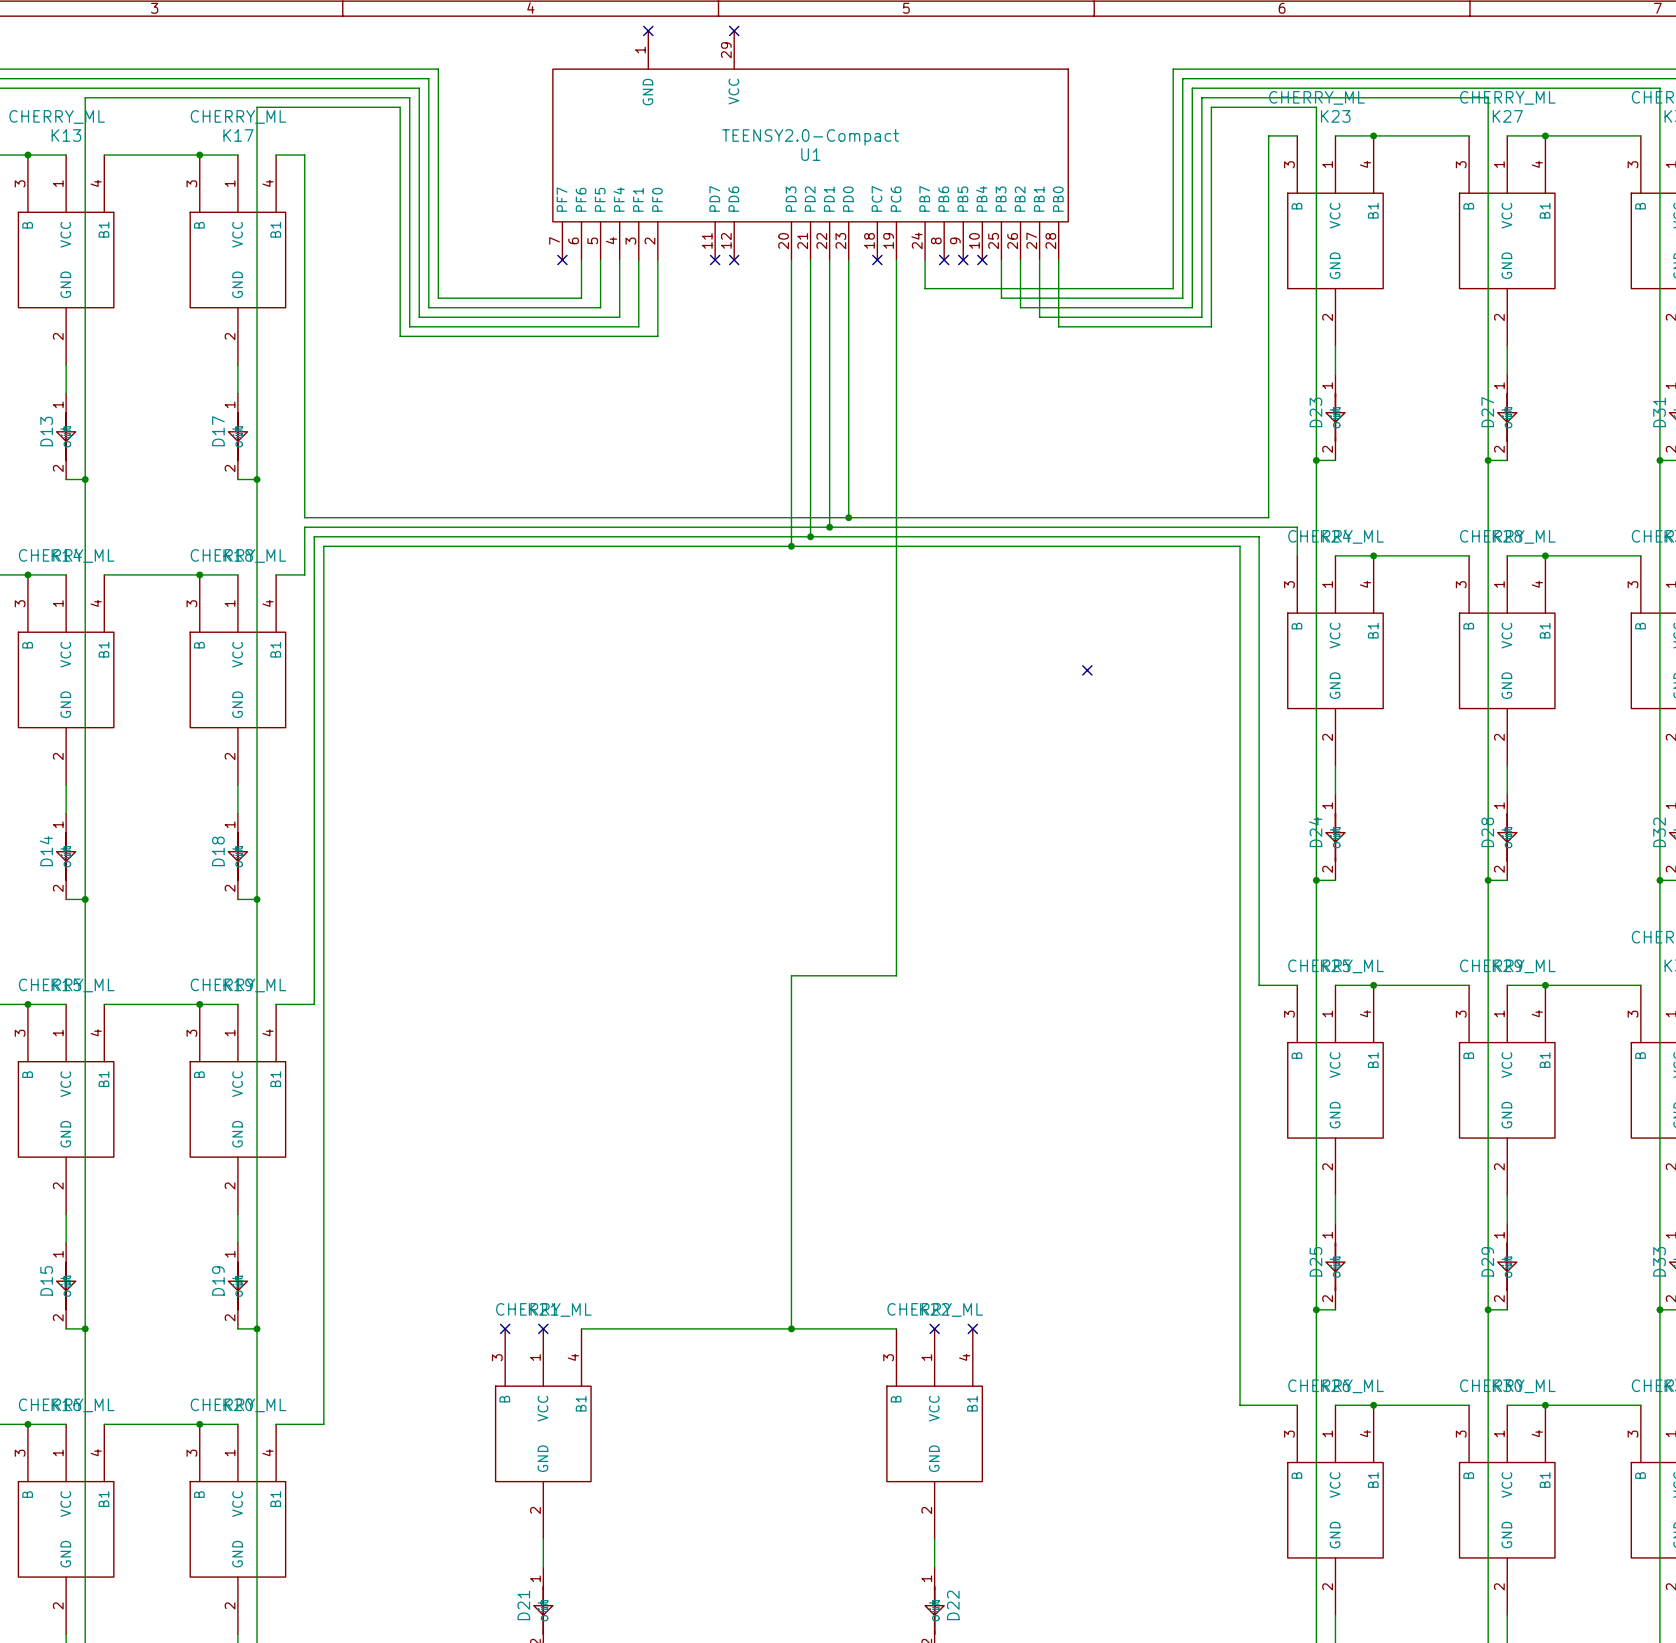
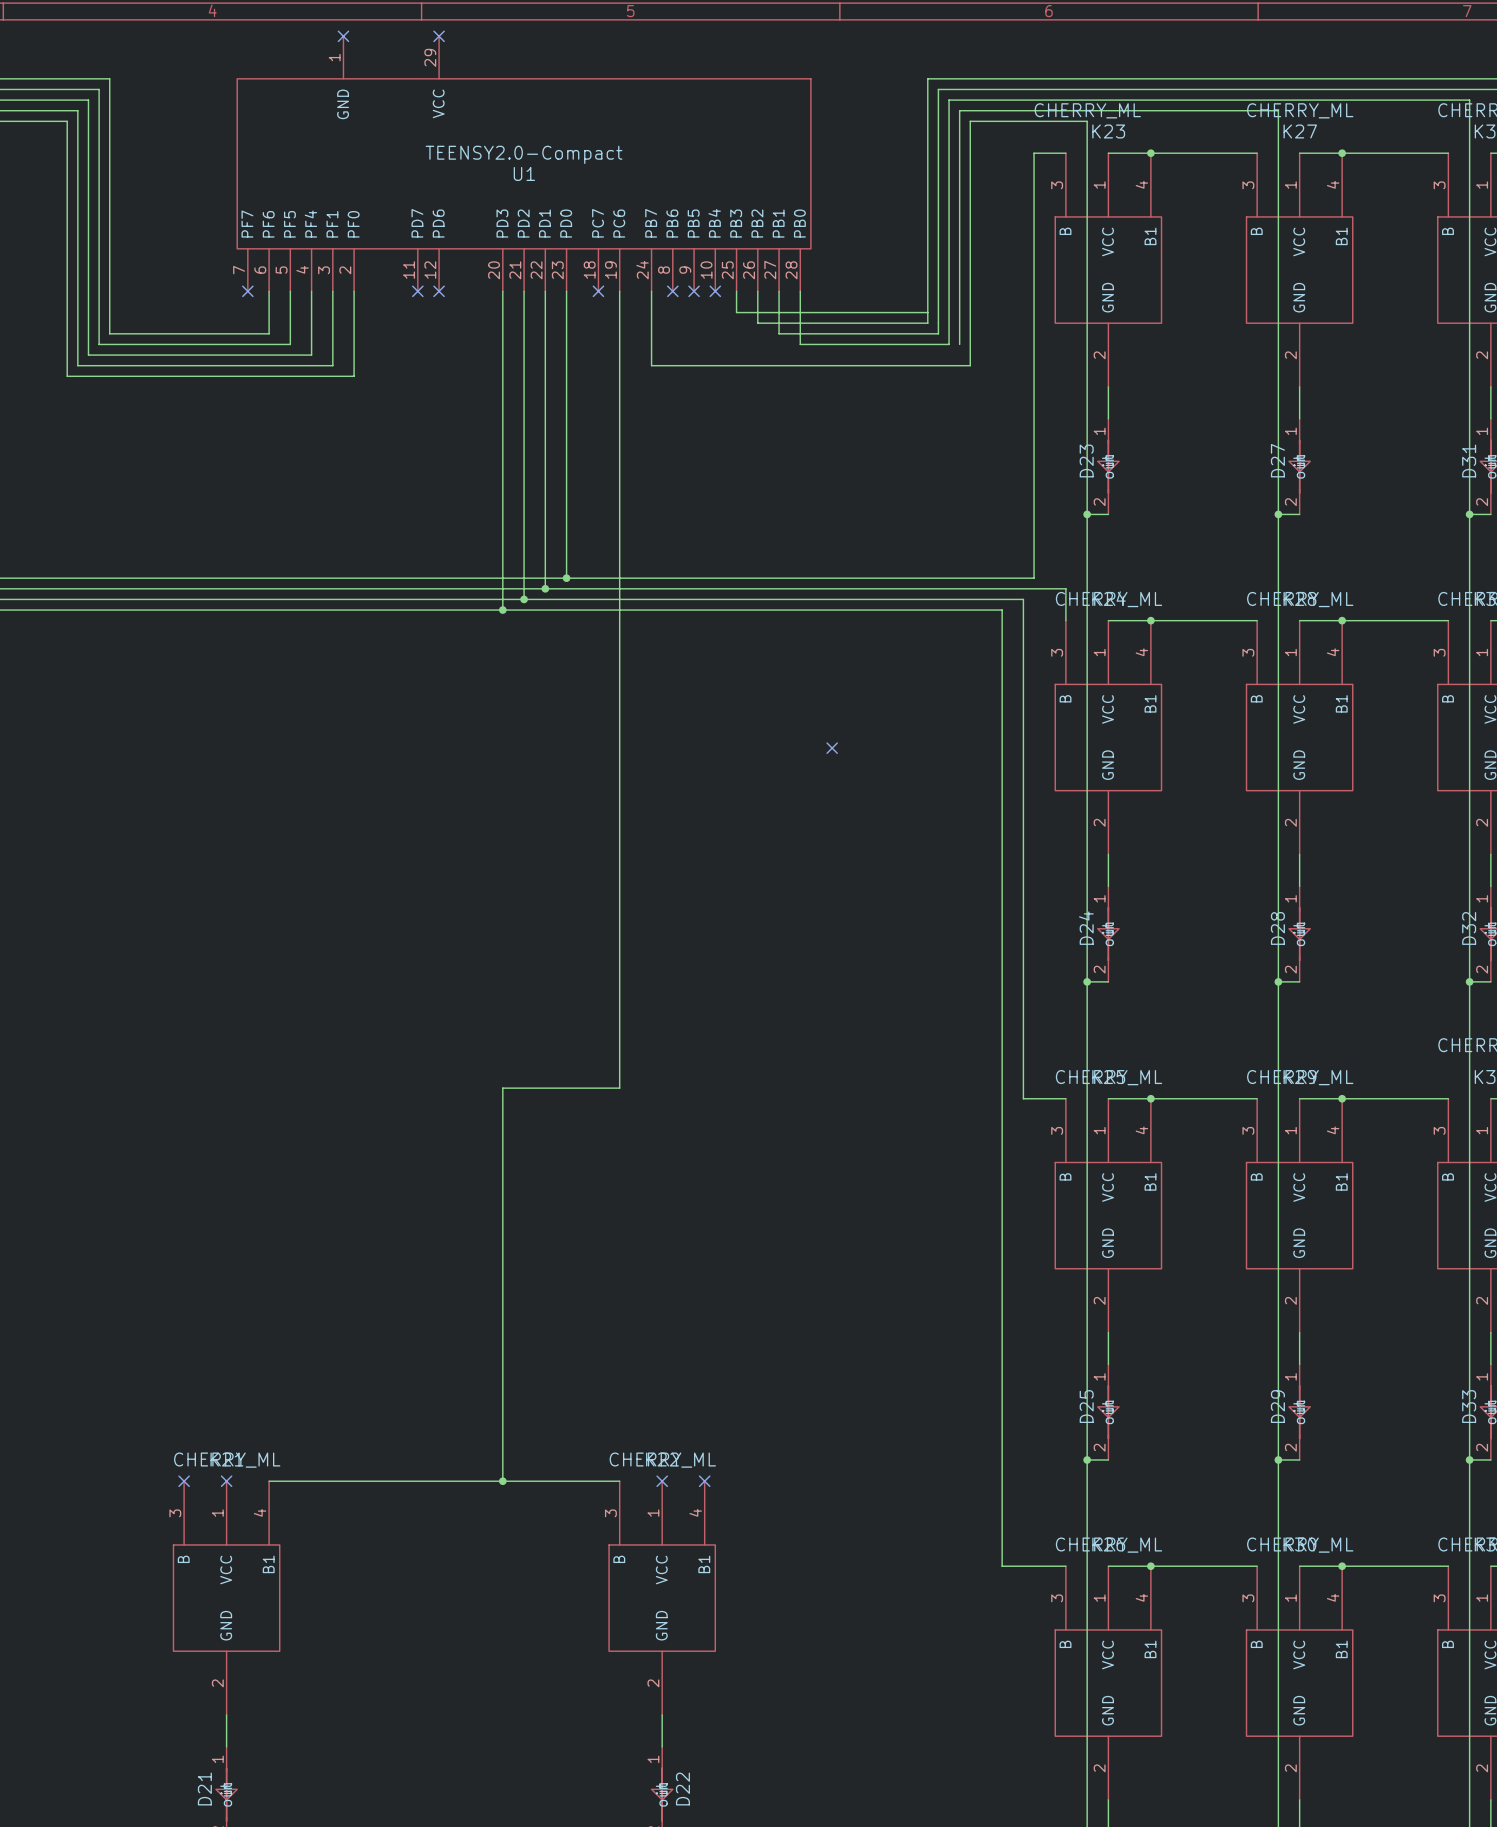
wire: (1001, 279) (1001, 298) (1039, 298) (1039, 317) (1201, 317) (1201, 307) -> (736, 312) (927, 312)
wire: (925, 288) (1020, 288) (1020, 307) (1058, 307) (1058, 326) -> (651, 323) (651, 365) (800, 365)

